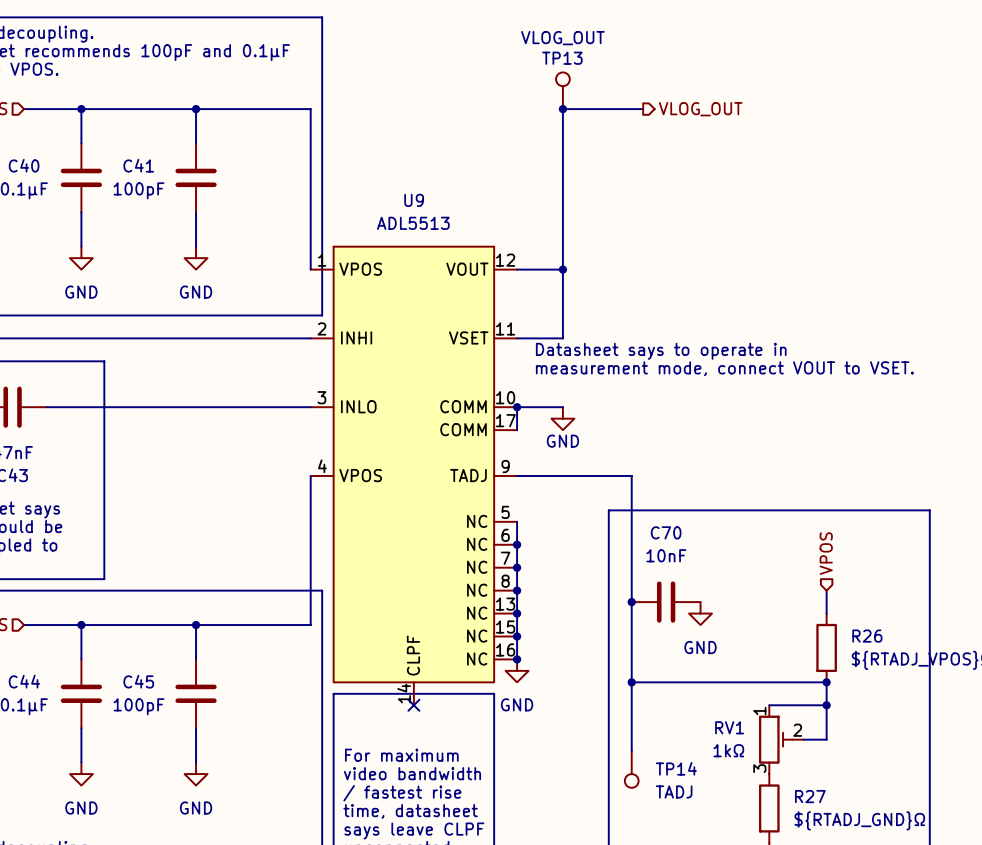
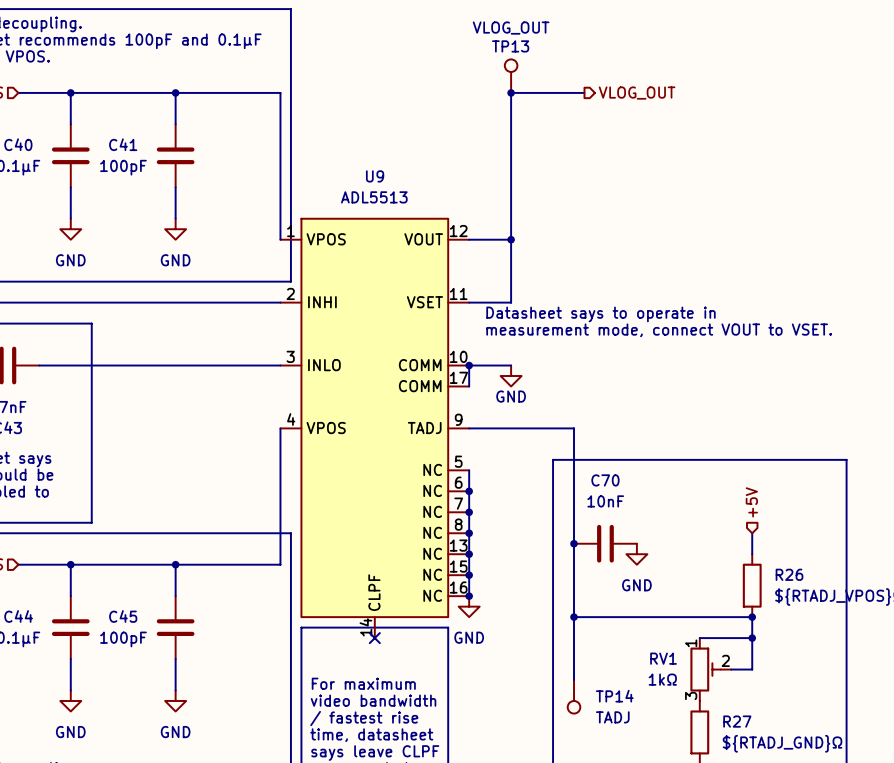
hierarchical label: VPOS (826, 553) -> +5V (751, 502)

